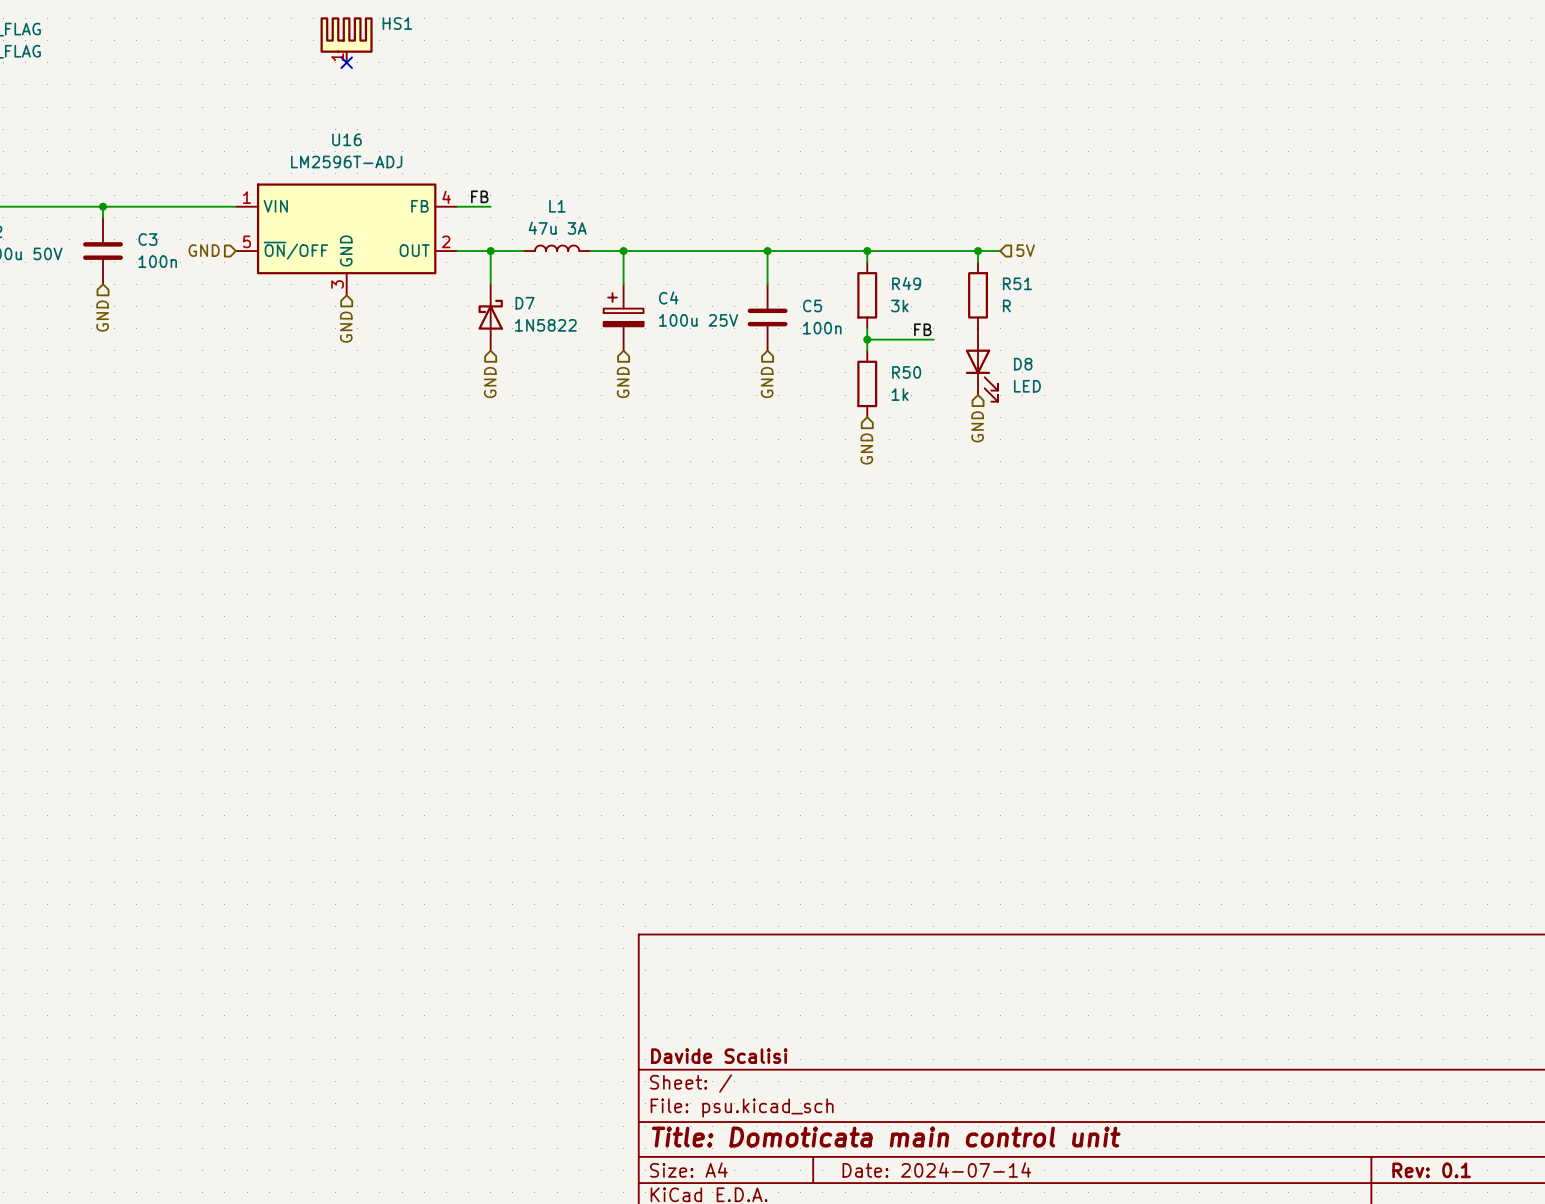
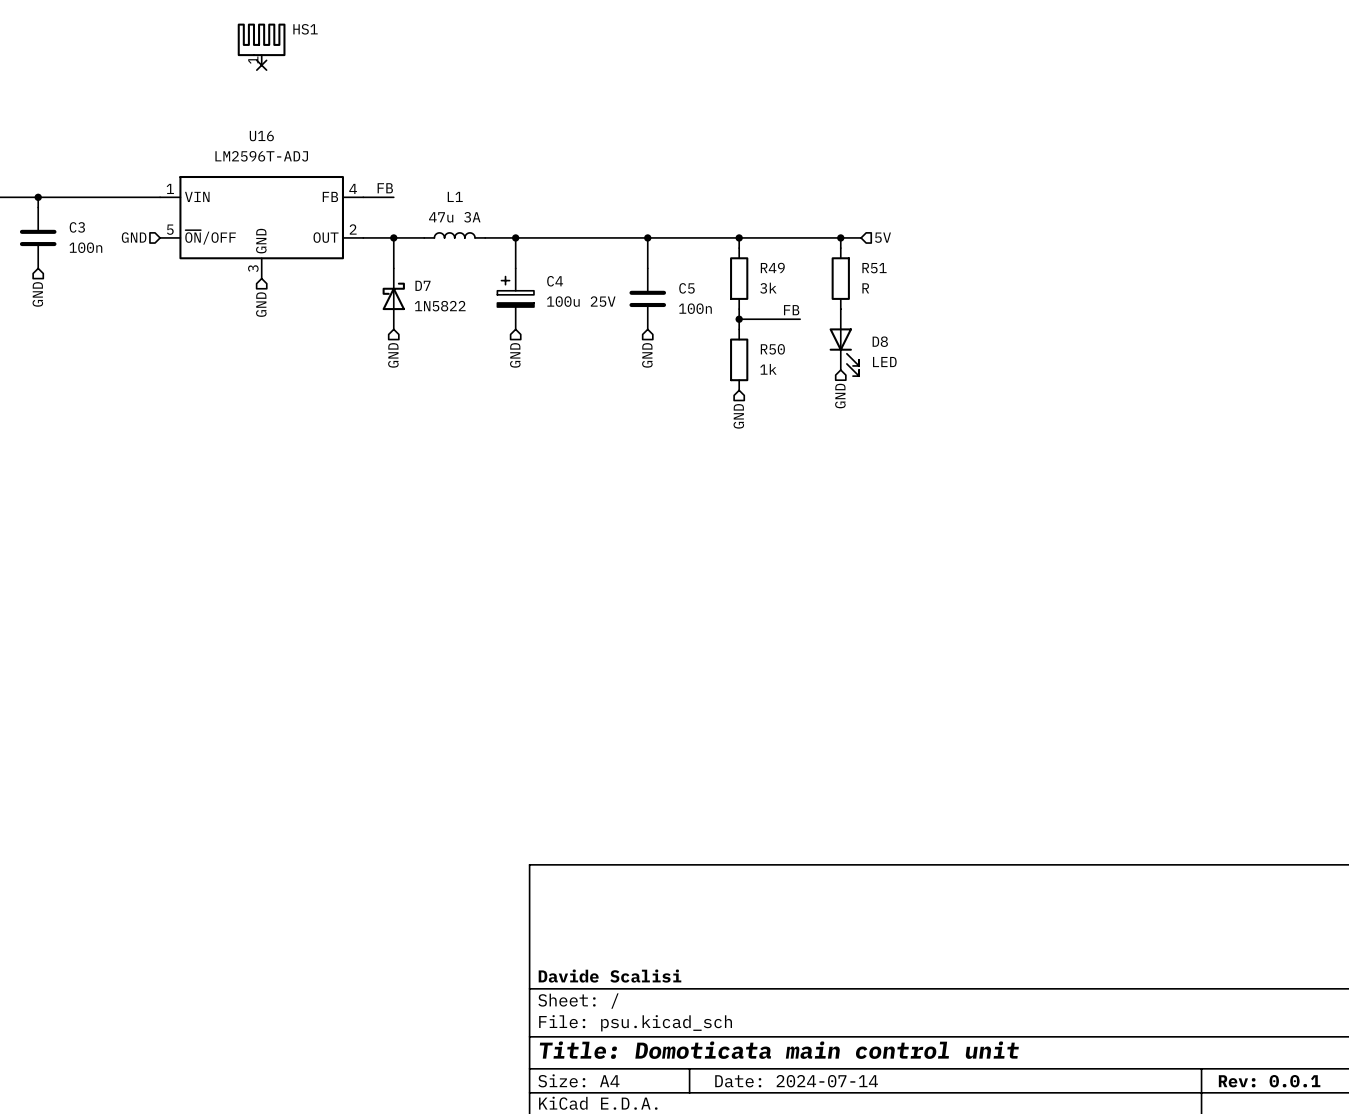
title block: Rev: 0.1 (1431, 1170) -> Rev: 0.0.1 (1269, 1081)

